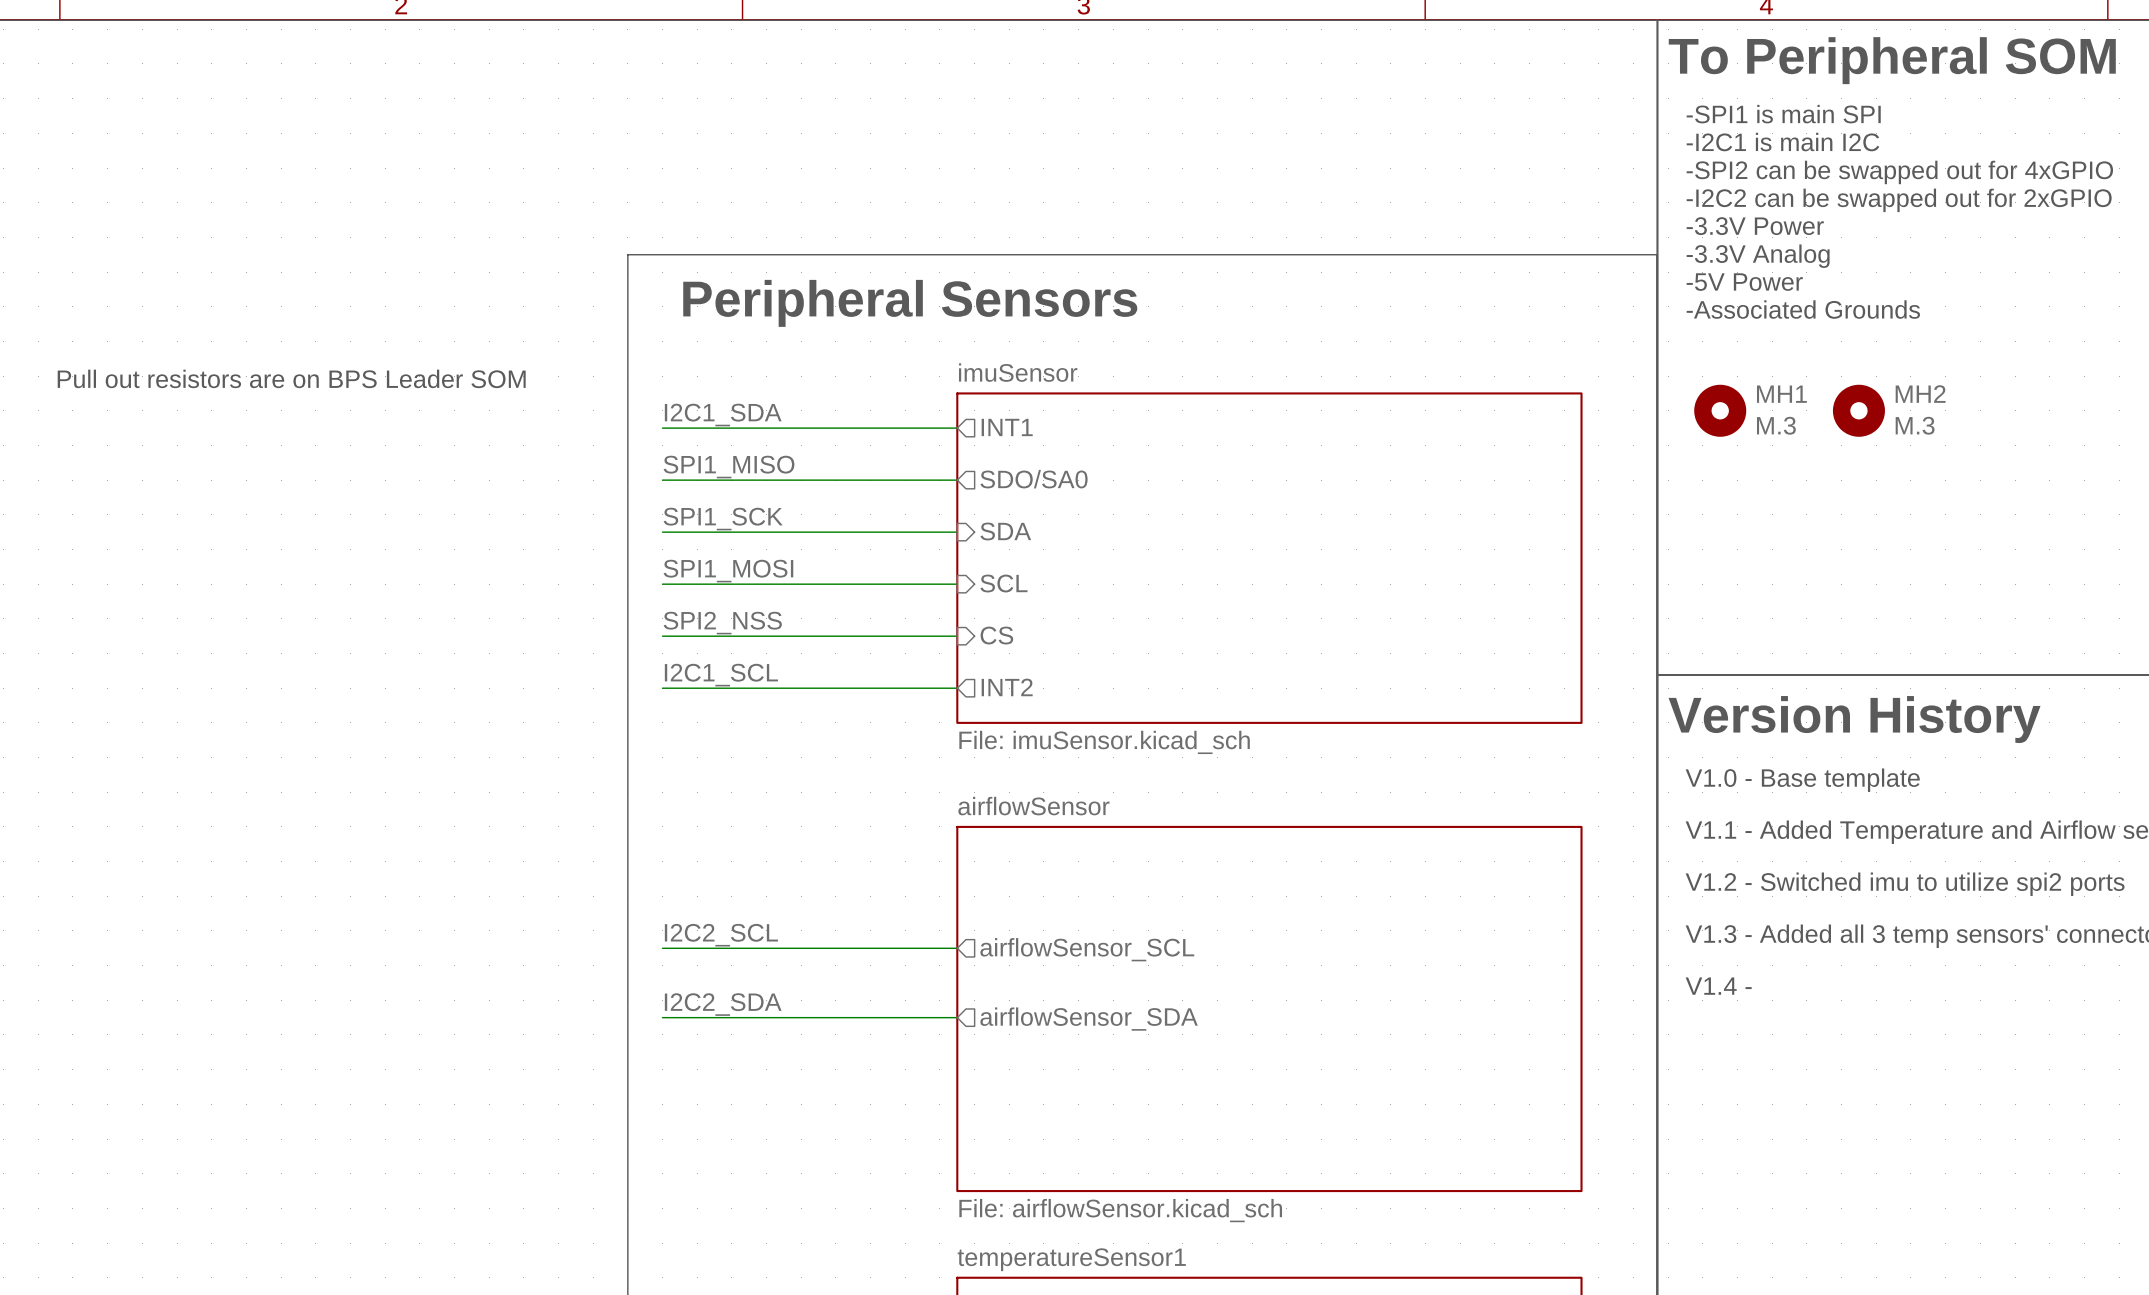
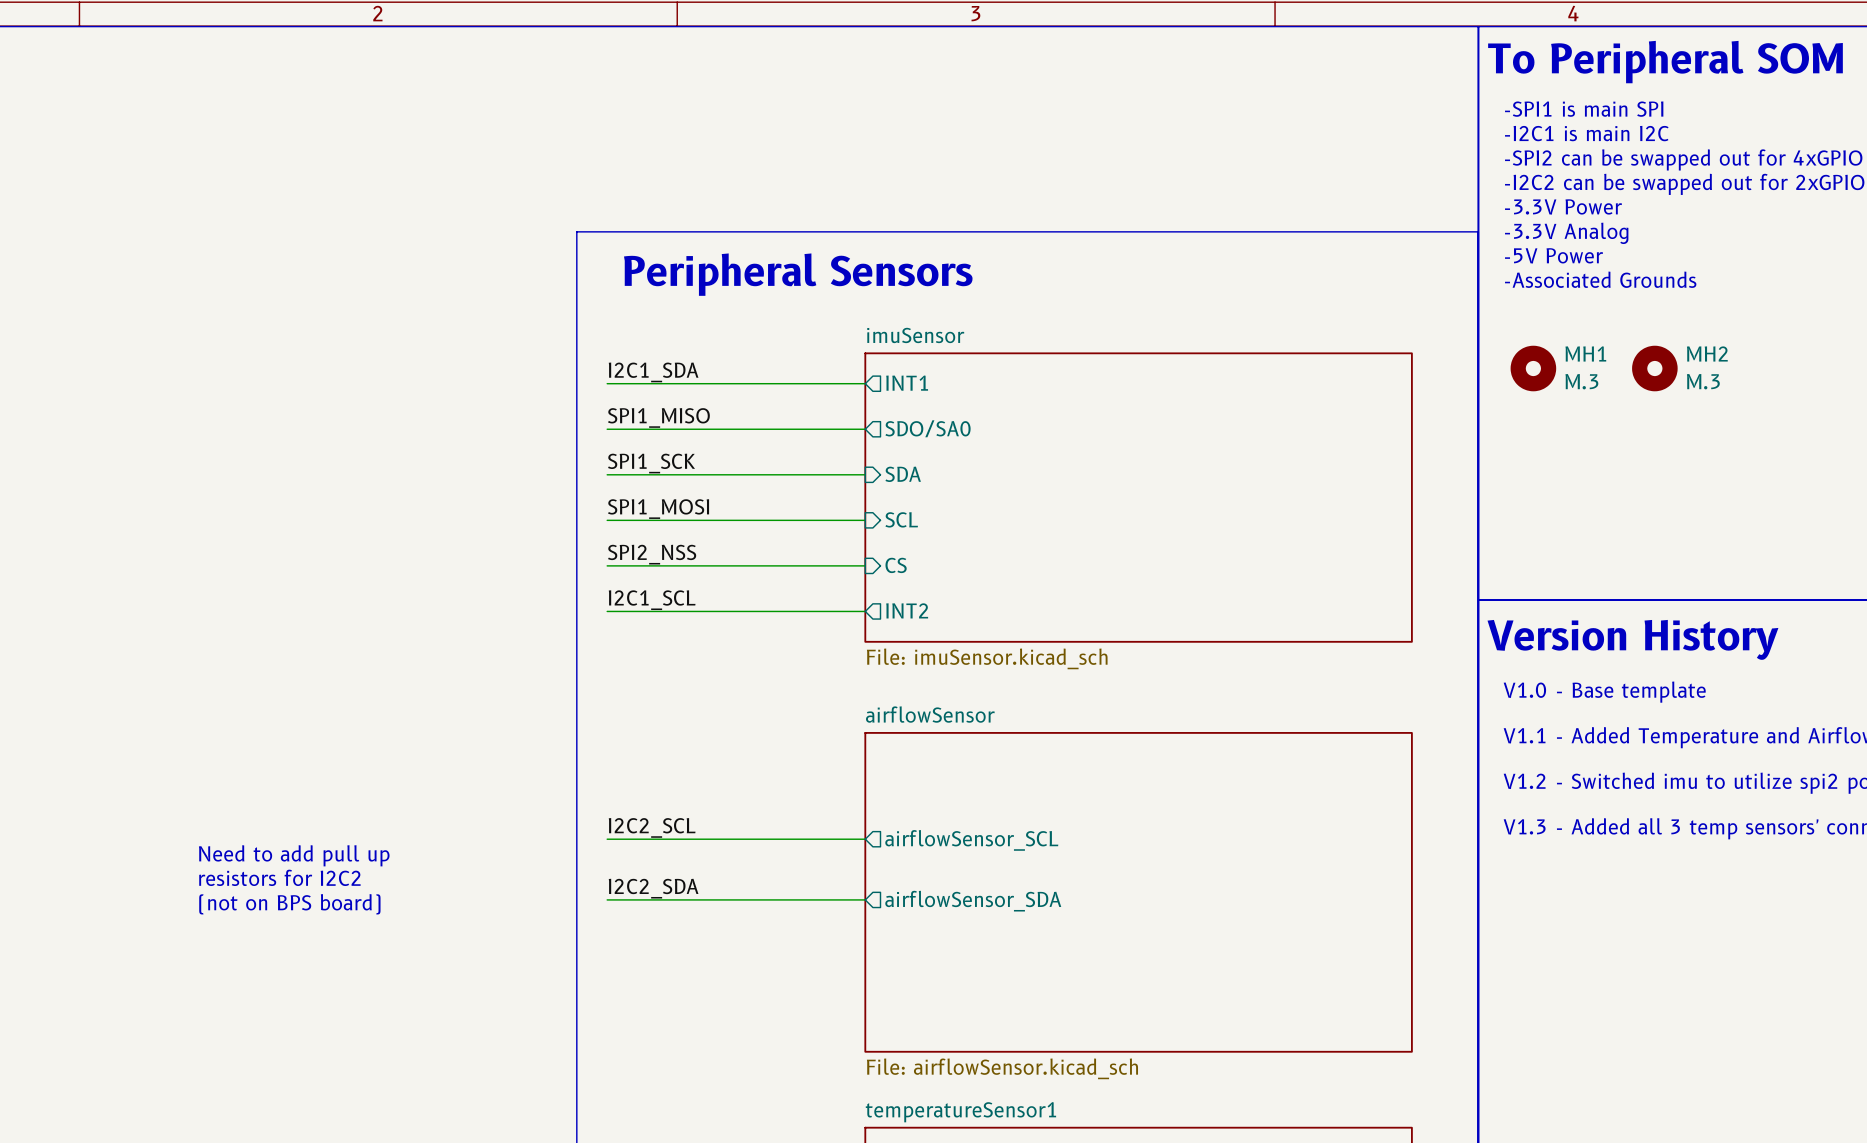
text: Pull out resistors are on BPS Leader SOM (291, 378) -> none
text: none -> Need to add pull up (294, 855)
text: V1.4 - (1718, 986) -> none
text: none -> resistors for I2C2 (279, 877)
text: none -> (not on BPS board) (289, 904)

